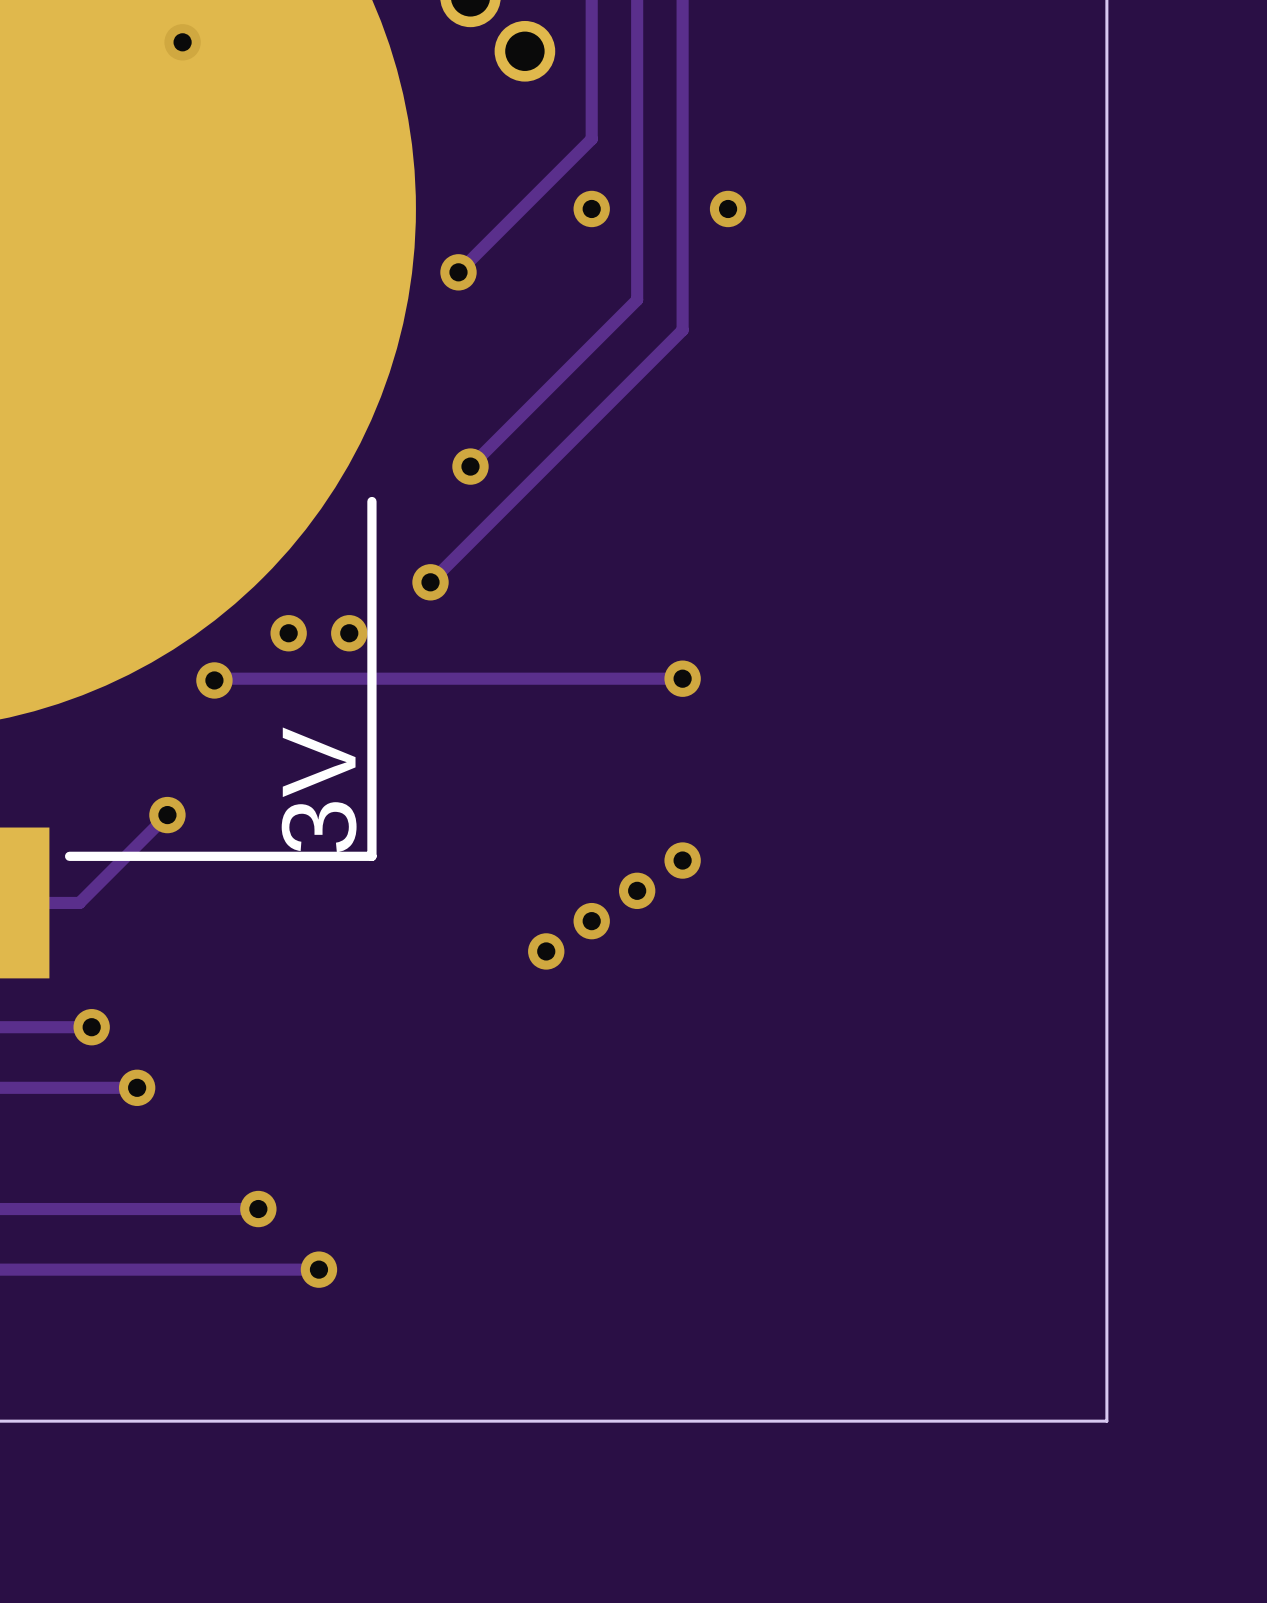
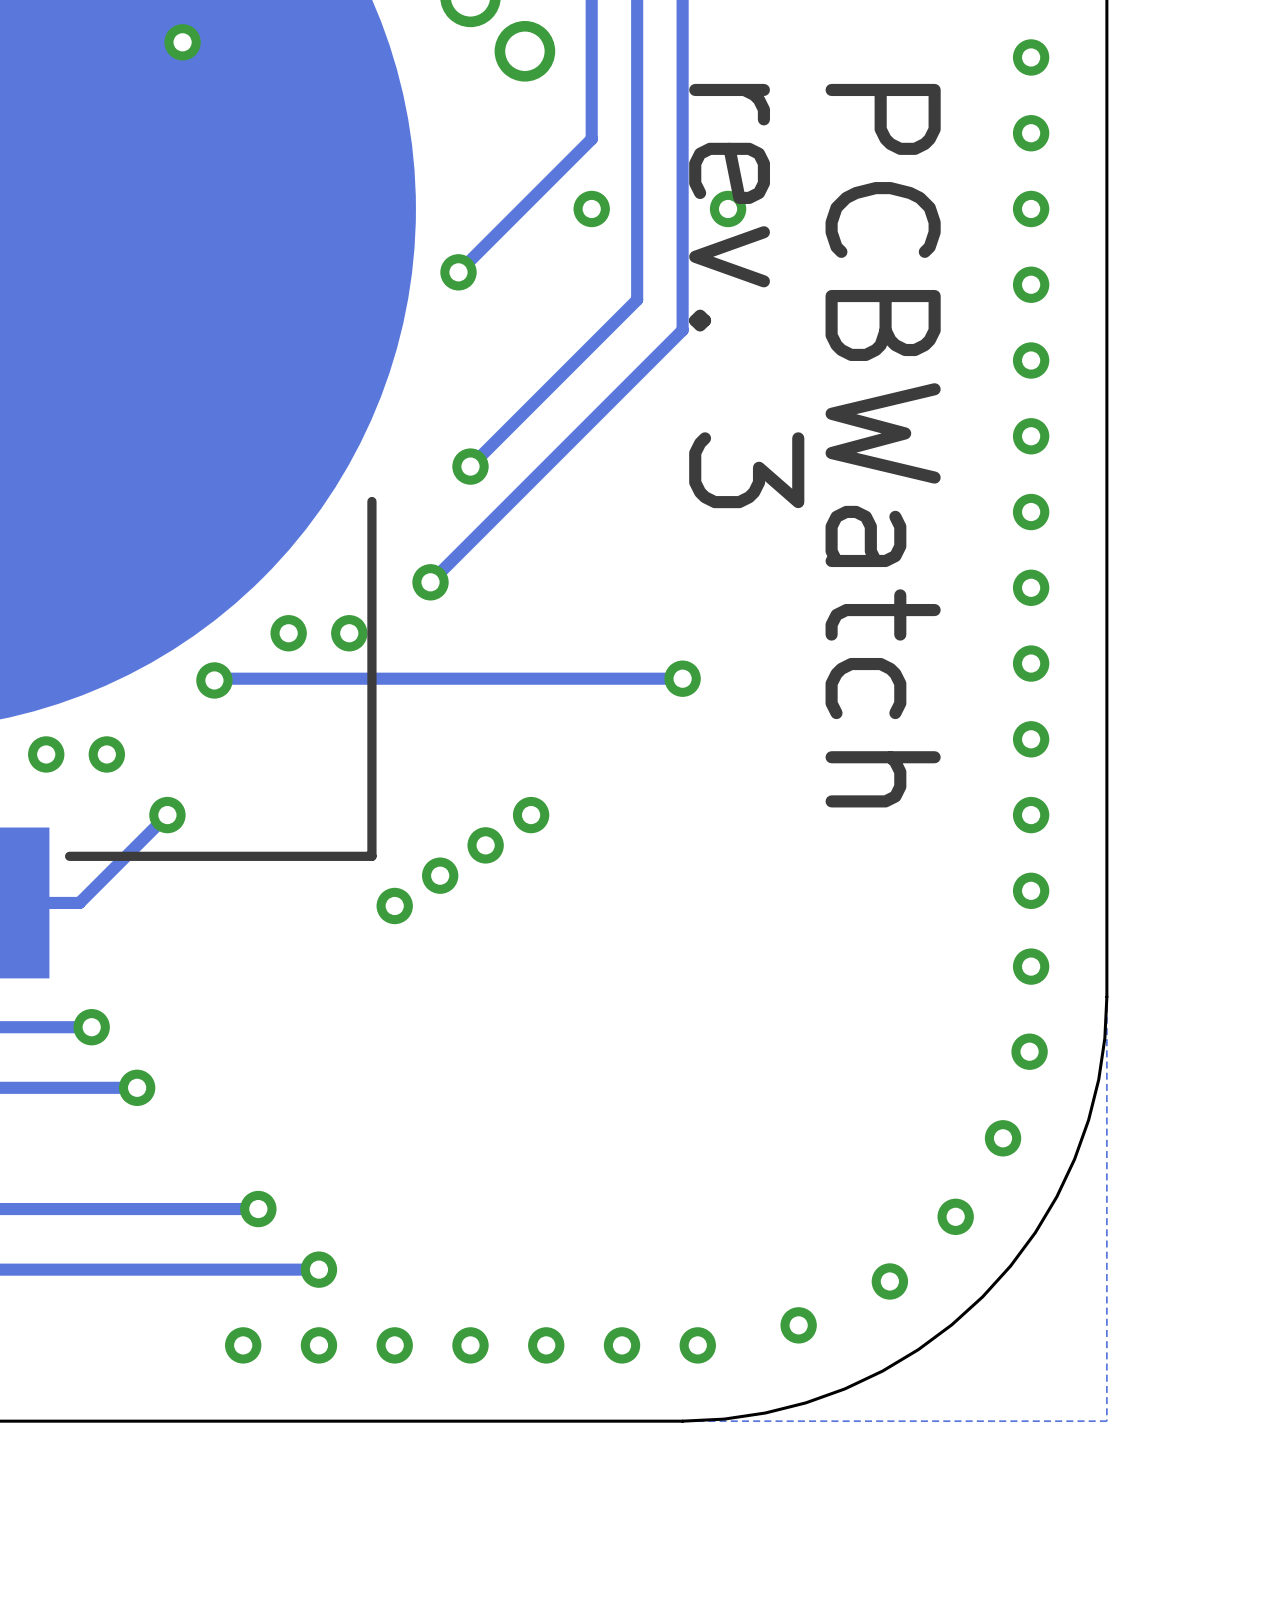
via: none -> (1031, 57)
via: none -> (1031, 133)
via: none -> (1031, 208)
text: none -> rev. 3 (746, 296)
via: none -> (1031, 284)
via: none -> (1031, 360)
text: none -> PCBWatch (883, 445)
via: none -> (1031, 436)
via: none -> (1031, 512)
via: none -> (1031, 587)
via: none -> (1031, 663)
via: none -> (1031, 739)
via: none -> (46, 754)
via: none -> (106, 754)
part text: 3V (319, 789) -> none
via: none -> (531, 815)
via: none -> (1031, 815)
via: none -> (485, 845)
via: (682, 860) -> none
via: none -> (440, 875)
via: (637, 890) -> none
via: none -> (1031, 890)
via: none -> (394, 905)
via: (591, 921) -> none
via: (546, 951) -> none
via: none -> (1031, 966)
board edge: (1106, 996) (1106, 1421) (682, 1421) -> (1106, 996) (1104, 1038) (1098, 1079) (1088, 1120) (1074, 1159) (1056, 1196) (1035, 1232) (1010, 1266) (982, 1296) (951, 1324) (918, 1349) (882, 1371) (844, 1388) (805, 1402) (765, 1413) (724, 1419) (682, 1421)
via: none -> (1029, 1051)
via: none -> (1003, 1138)
via: none -> (955, 1216)
via: none -> (889, 1281)
via: none -> (798, 1325)
via: none -> (243, 1345)
via: none -> (318, 1345)
via: none -> (394, 1345)
via: none -> (470, 1345)
via: none -> (546, 1345)
via: none -> (622, 1345)
via: none -> (697, 1345)

